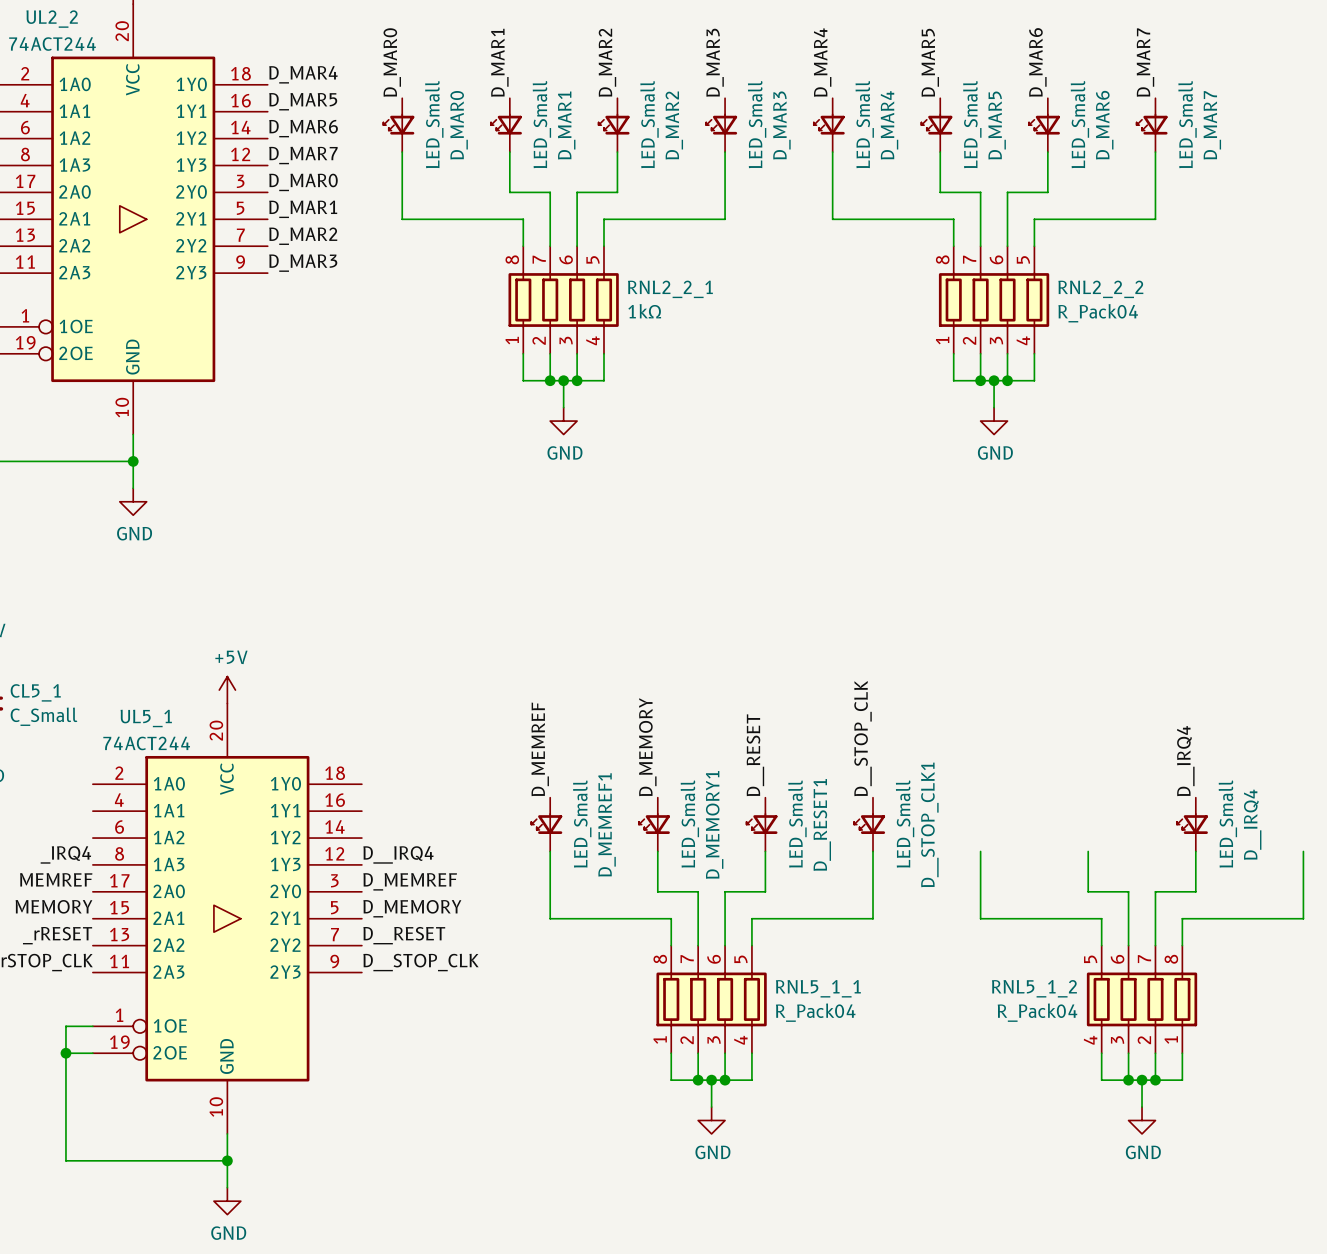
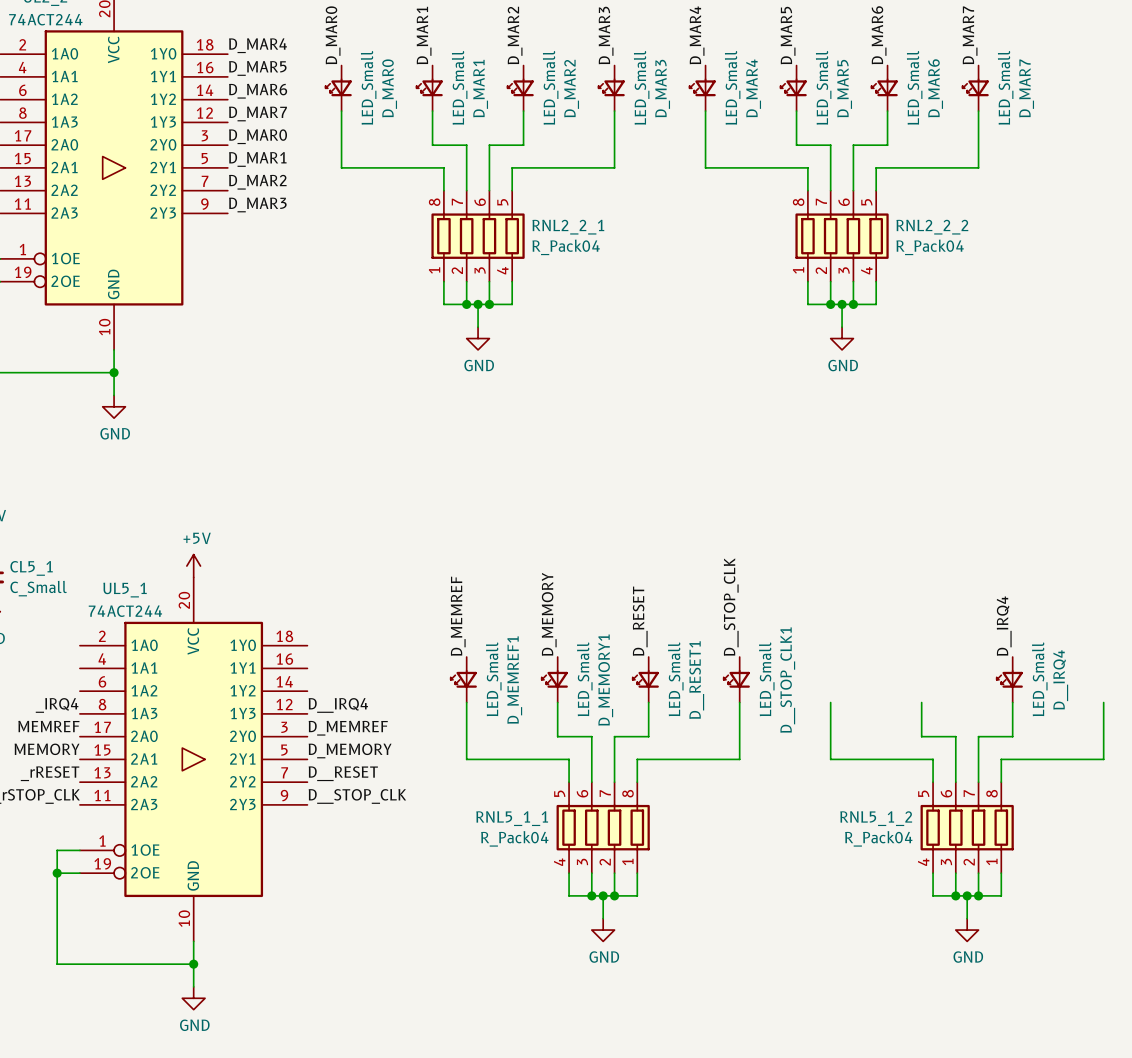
RNL2_2_1 value: 1kΩ (644, 311) -> R_Pack04 (566, 247)
RNL5_1_1 flip: as is (711, 999) -> left-right (603, 827)

